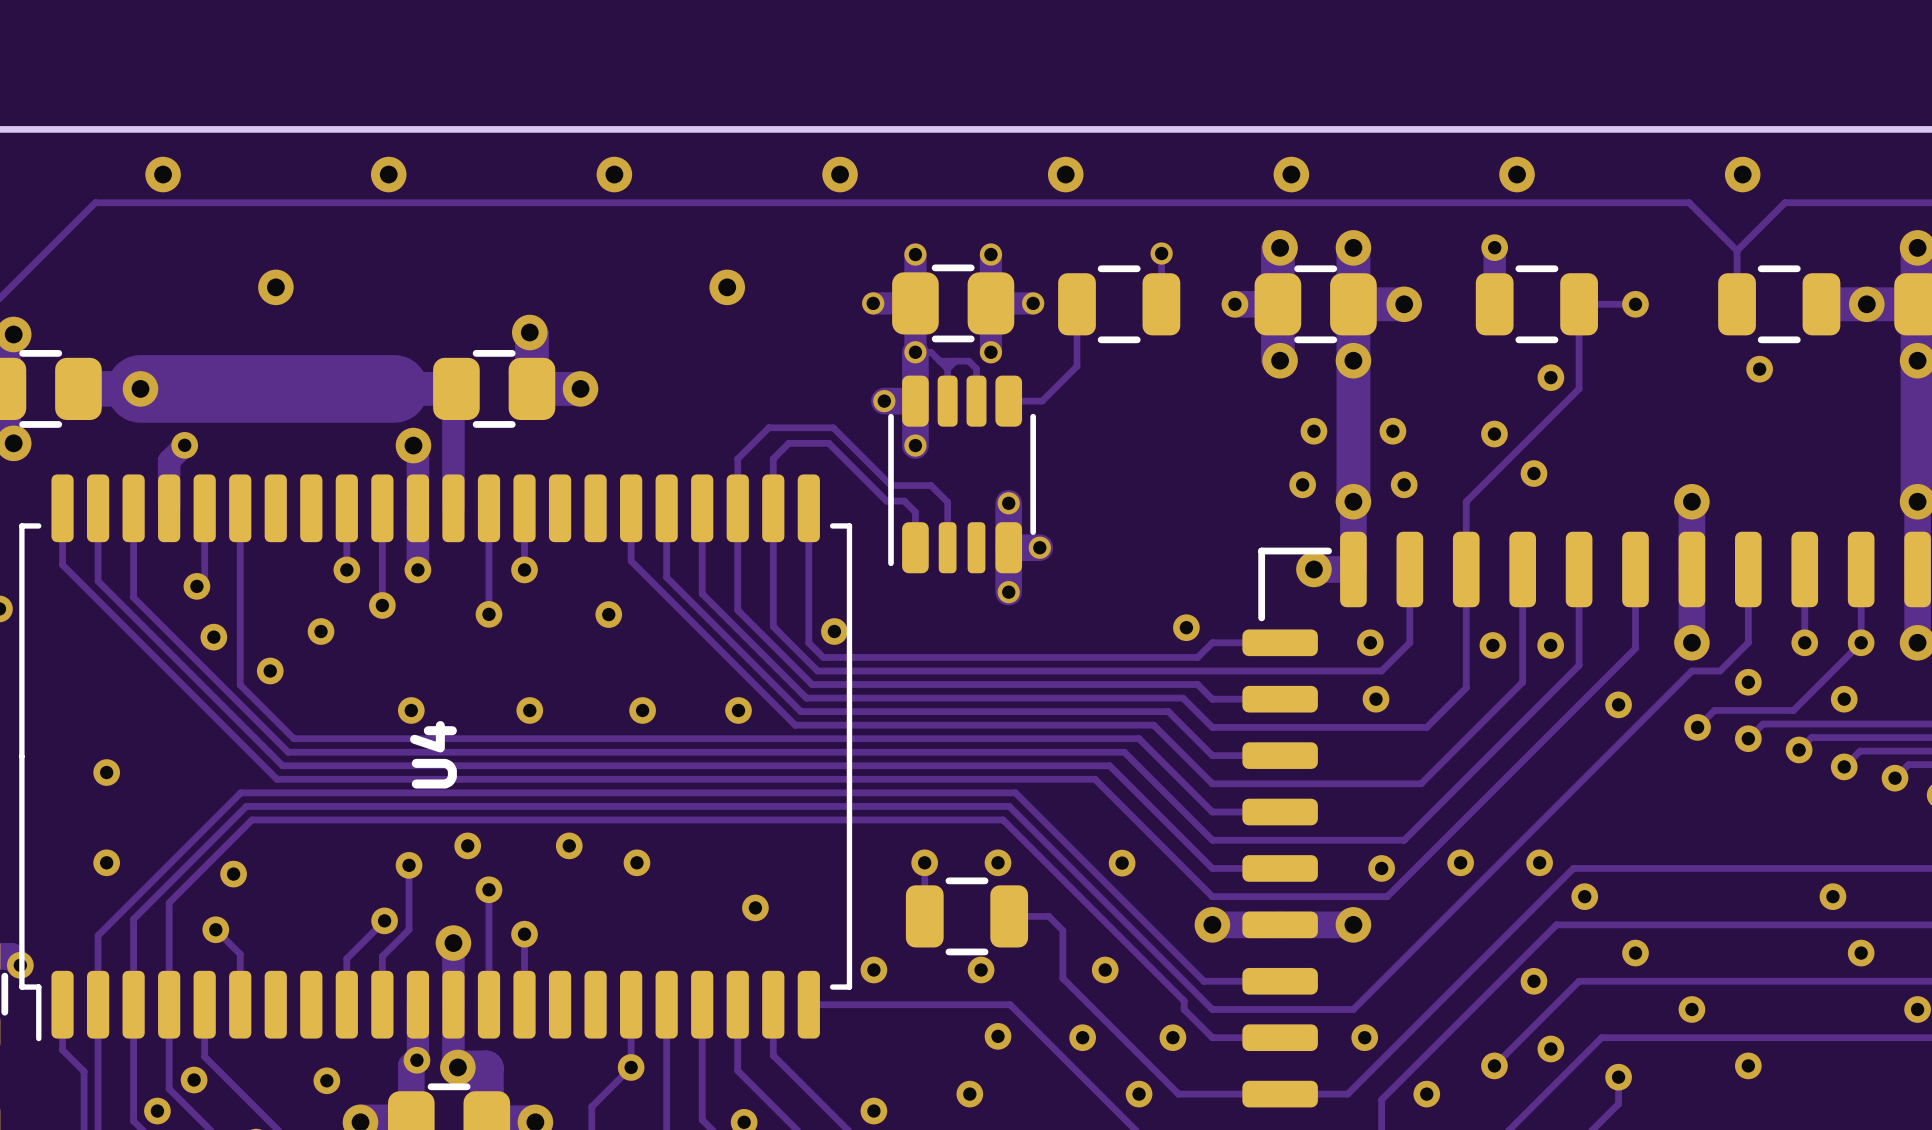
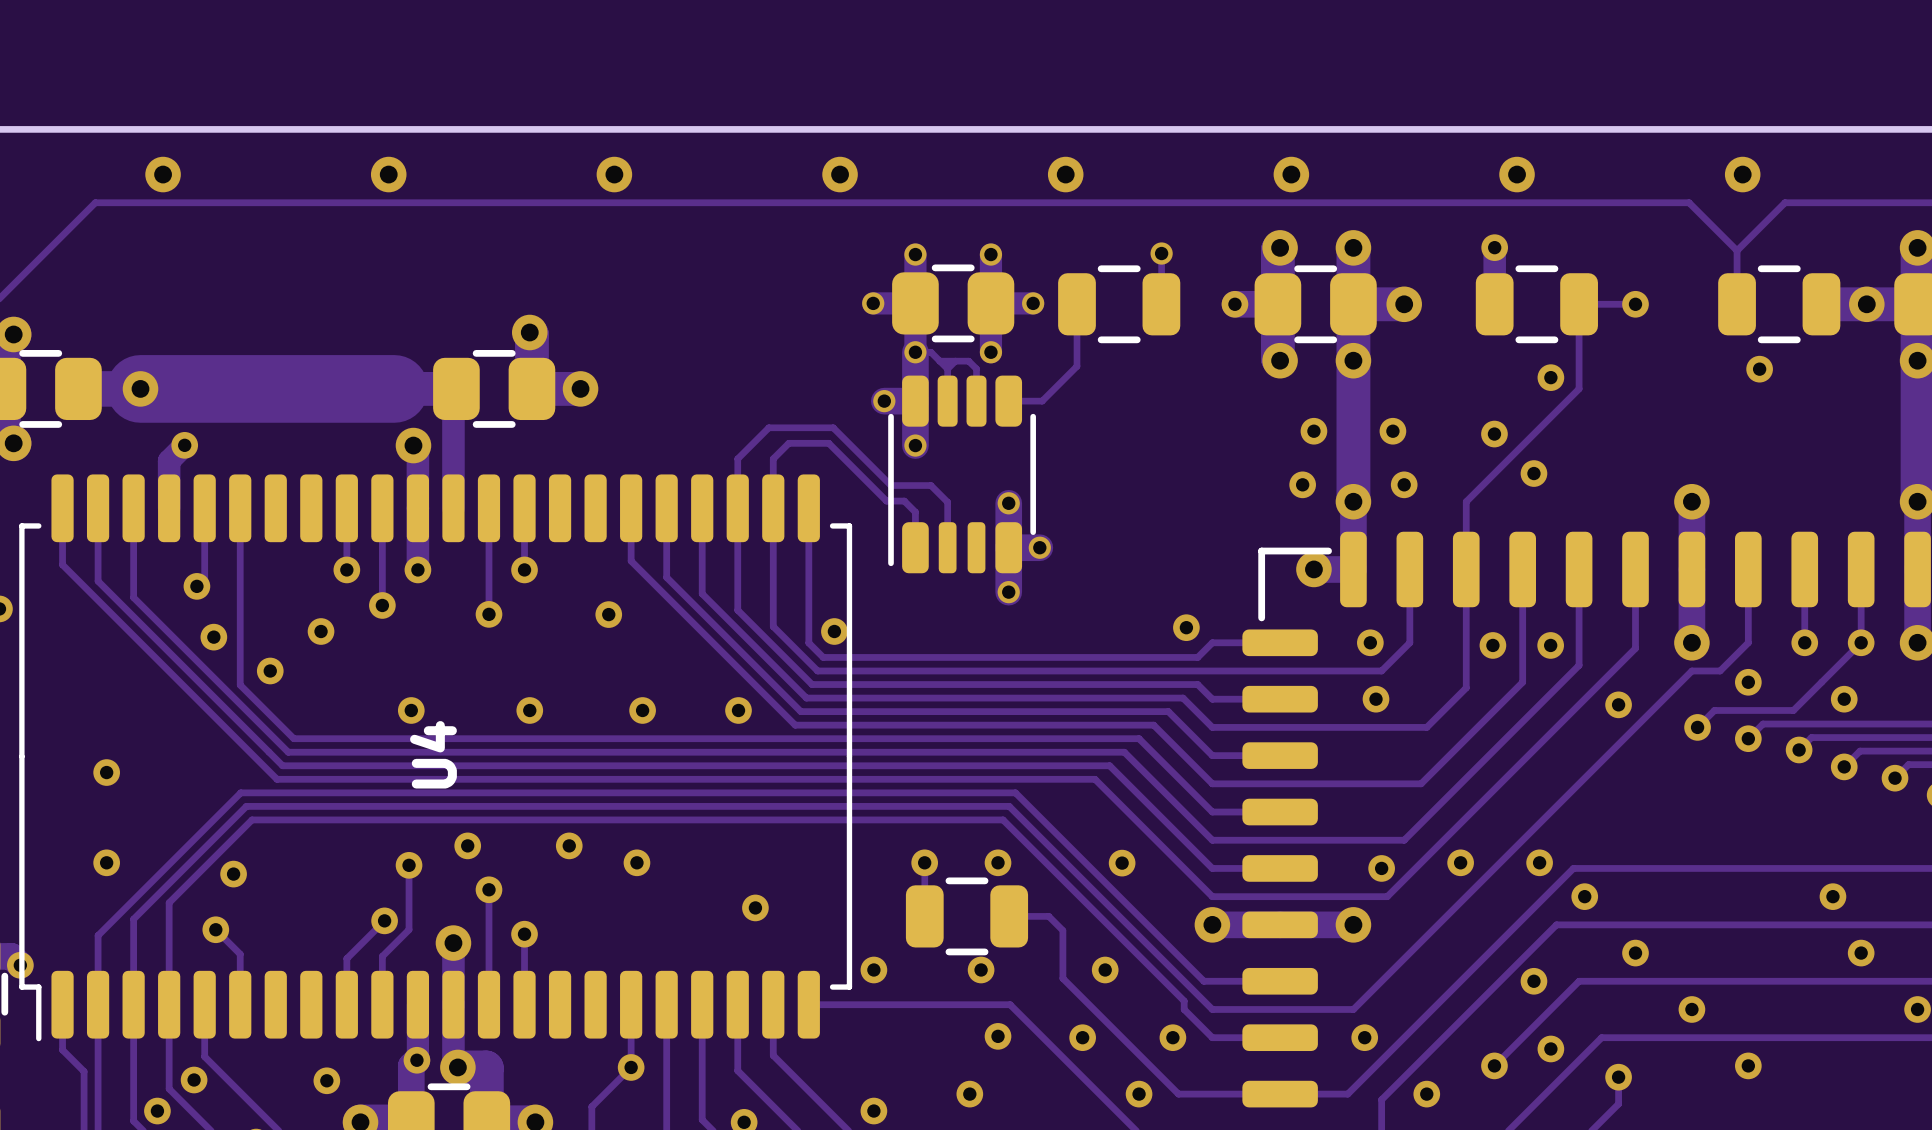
via: (275, 287) -> none
via: (727, 287) -> none

